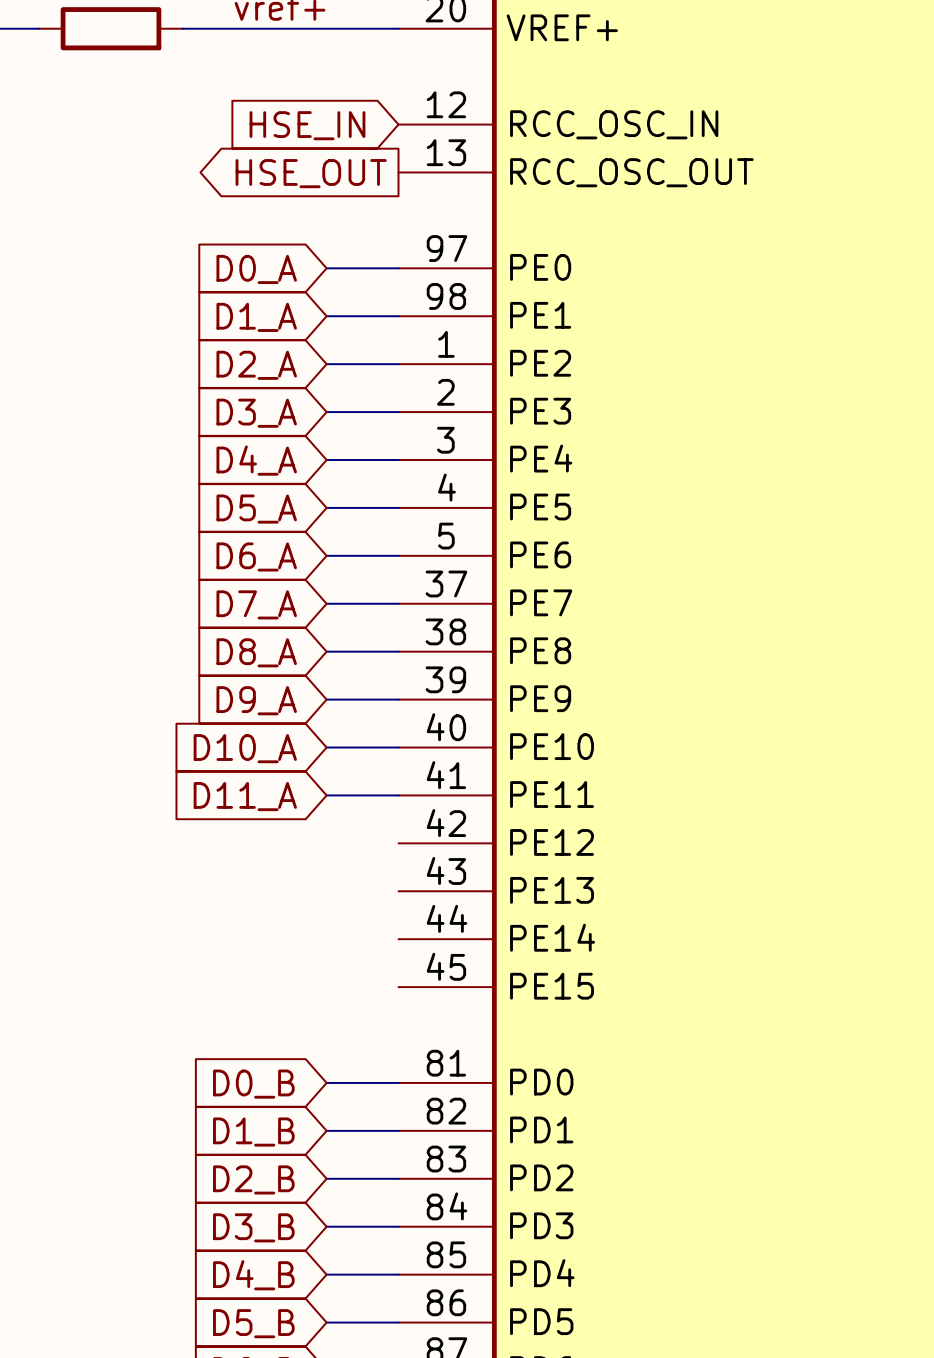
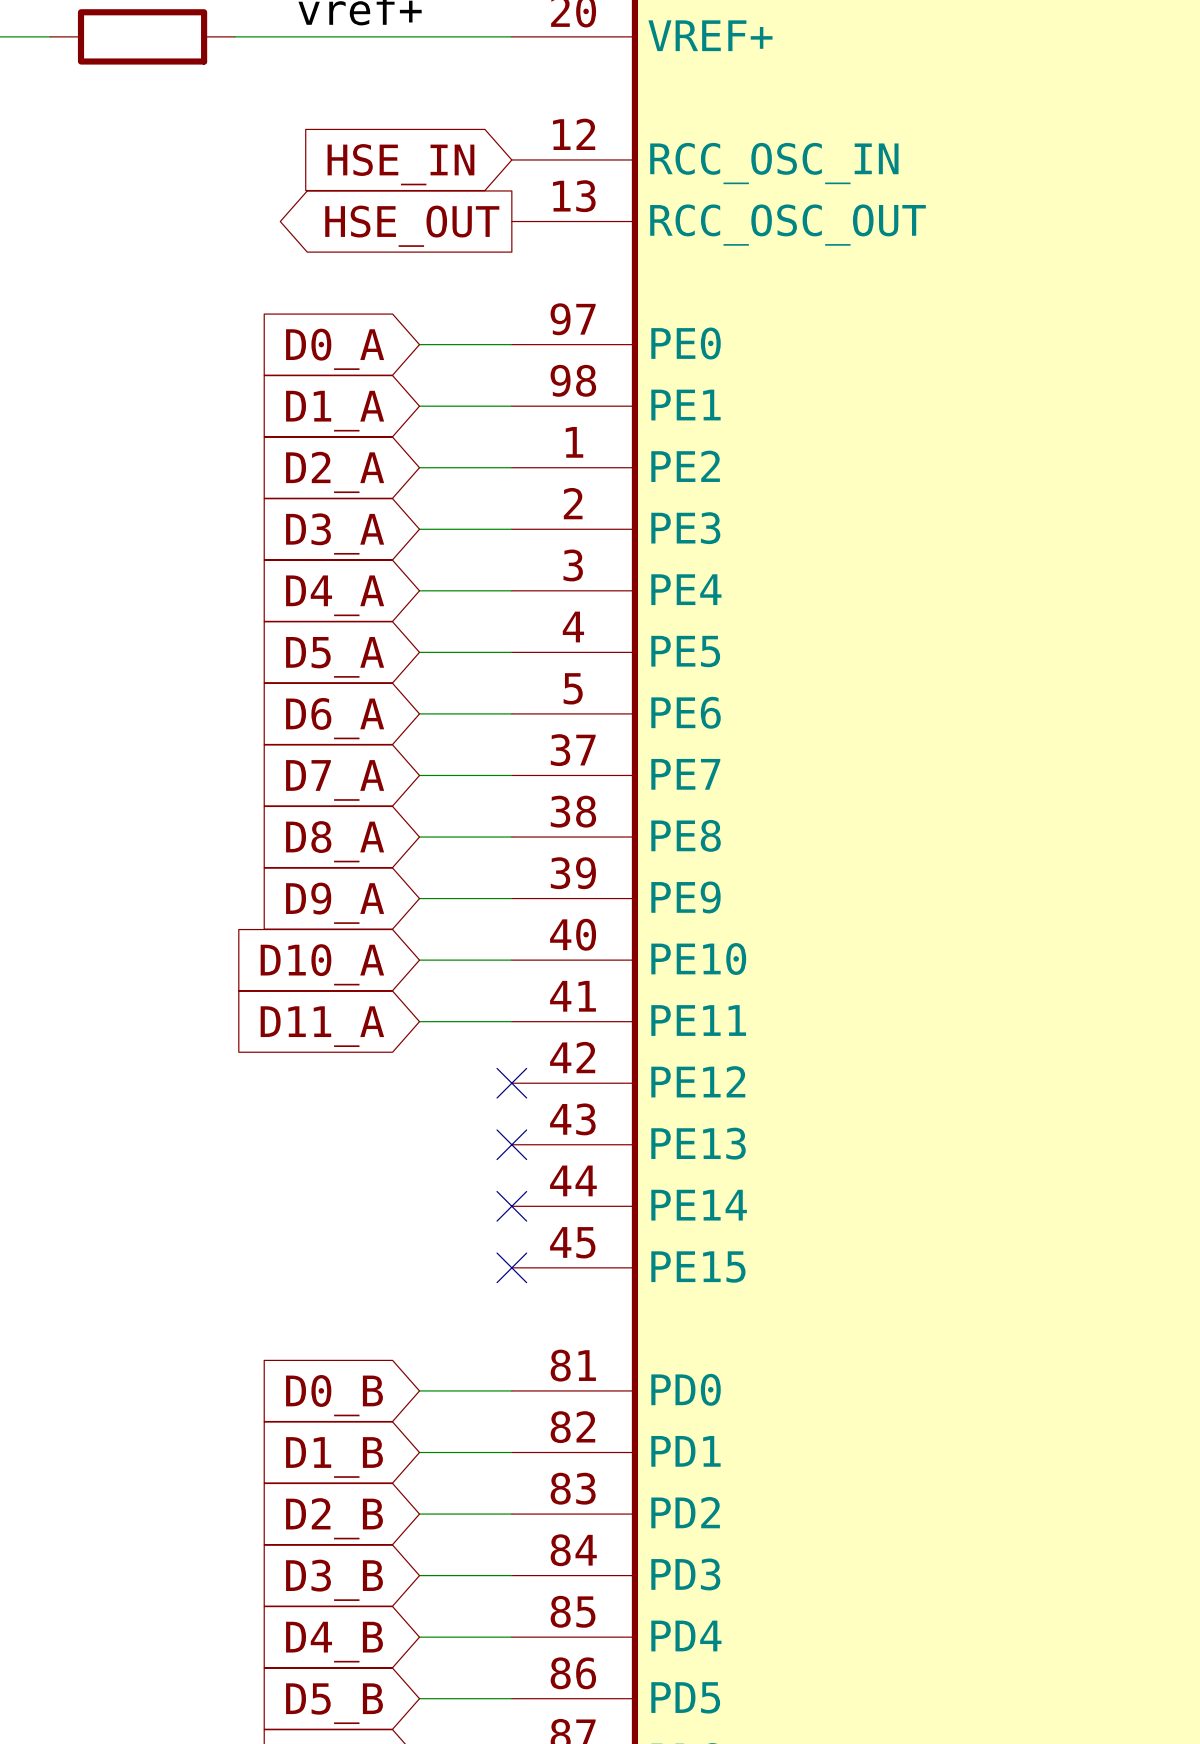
no-connect mark: none -> (511, 1083)
no-connect mark: none -> (511, 1144)
no-connect mark: none -> (511, 1206)
no-connect mark: none -> (511, 1267)

